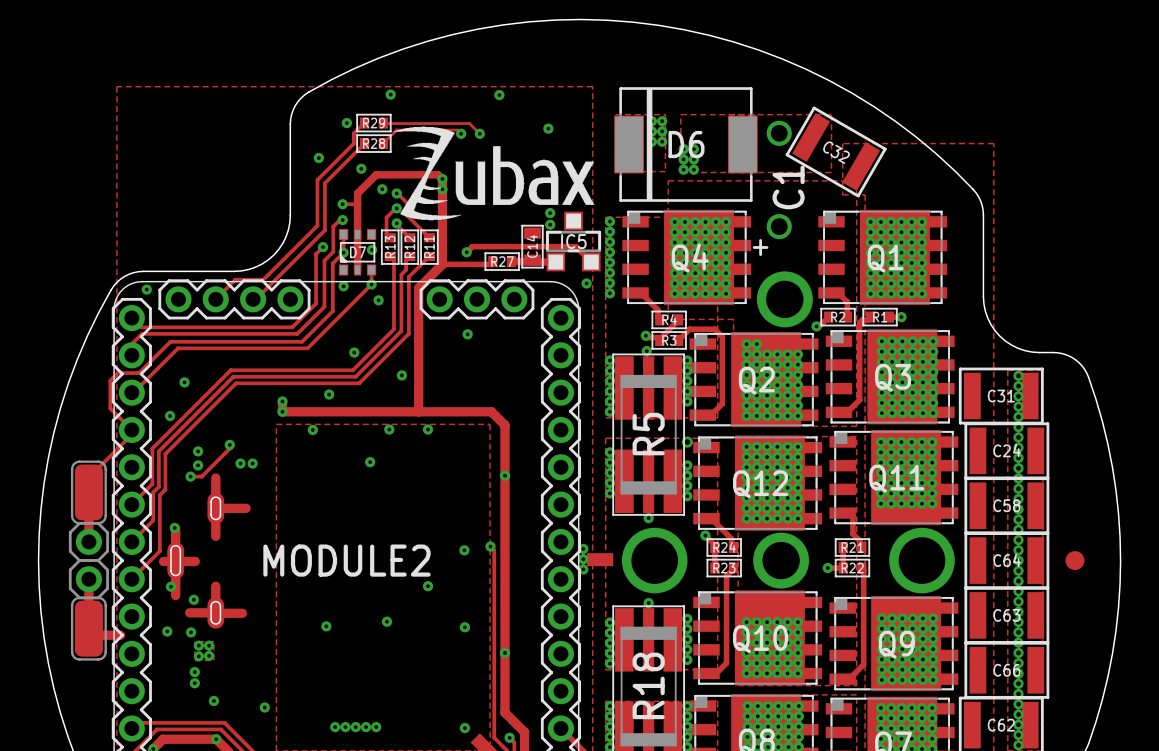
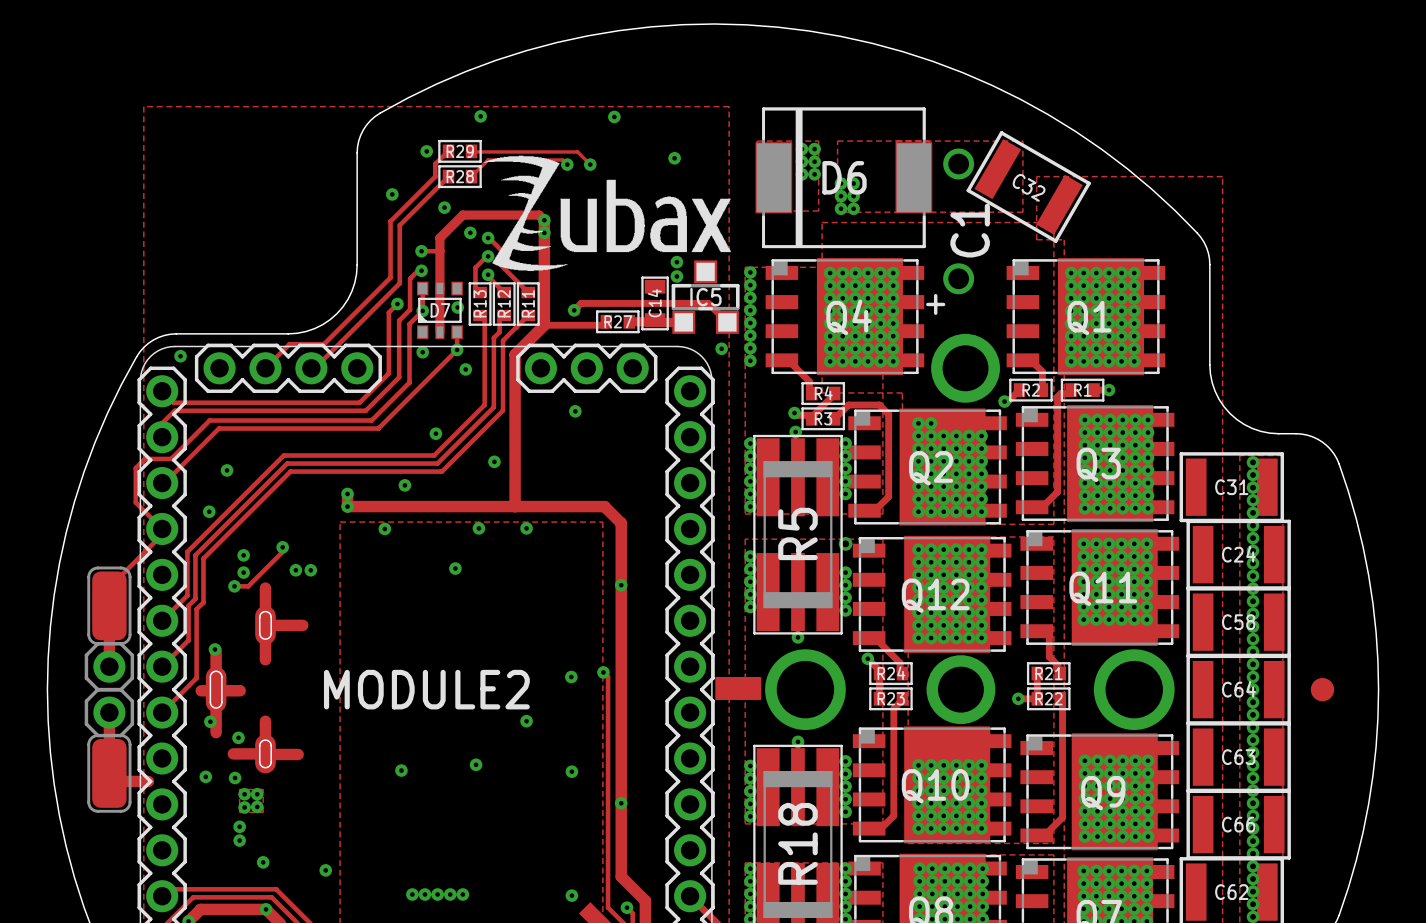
via: (583, 548) -> none
part footprint: [587, 553, 614, 567] -> [715, 677, 762, 700]
via: (583, 559) -> none
via: (583, 569) -> none

